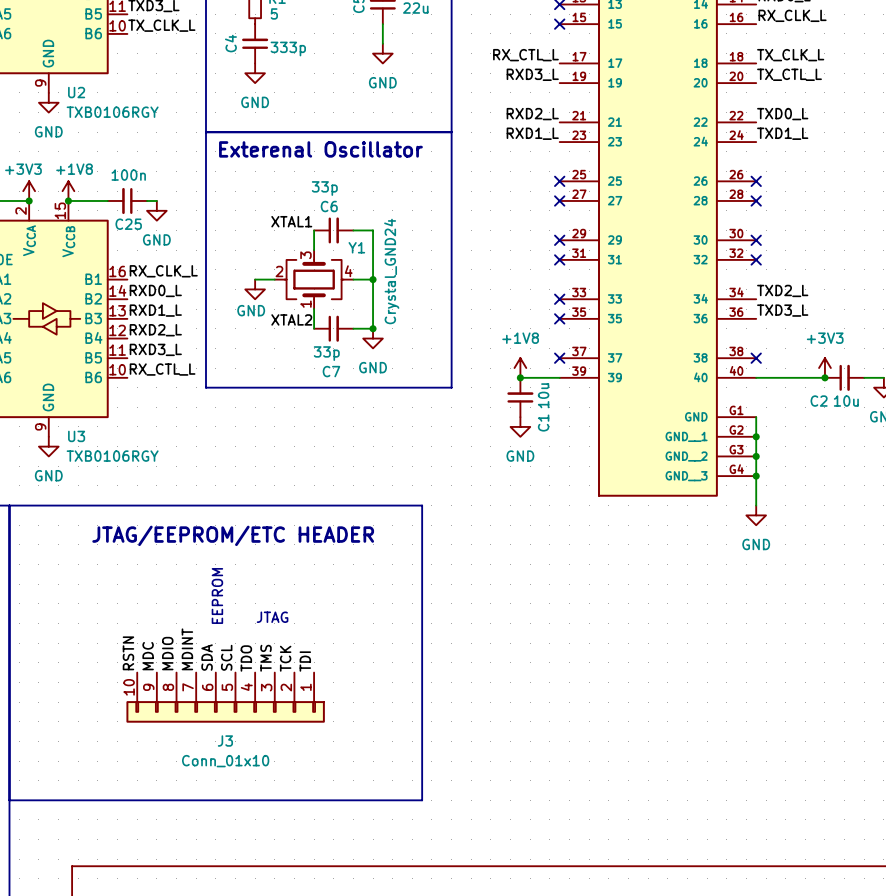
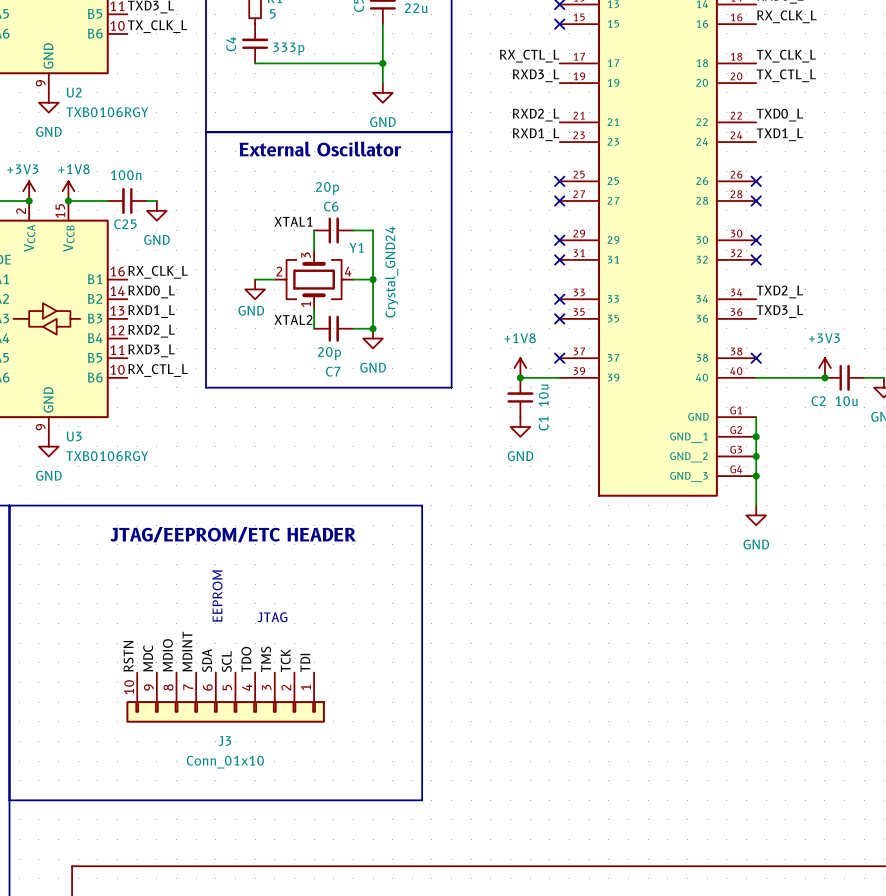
wire: none -> (382, 43) (382, 83)
power symbol position: GND (382, 53) -> GND (382, 92)
wire: none -> (255, 63) (382, 63)
junction: none -> (382, 63)
power symbol: GND (255, 73) -> none
text: Exterenal Oscillator (320, 149) -> External Oscillator (320, 149)
C6 value: 33p (324, 188) -> 20p (327, 188)
C7 value: 33p (326, 353) -> 20p (329, 353)

